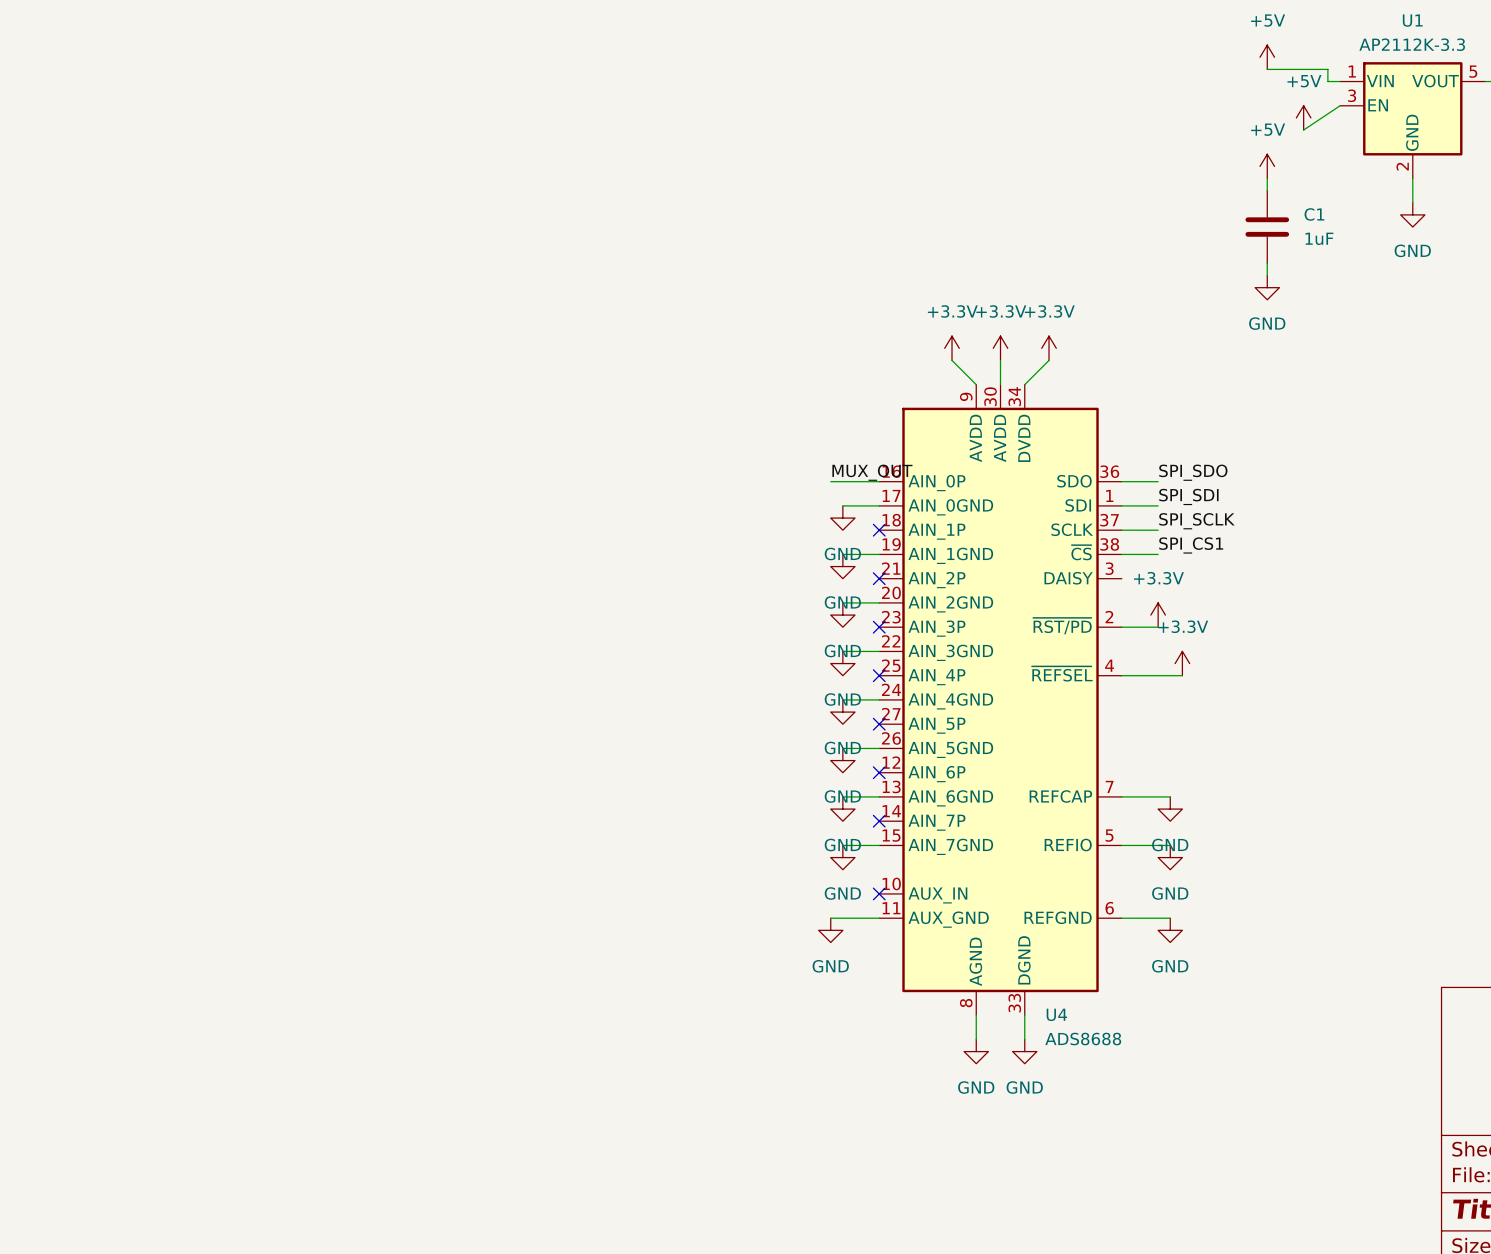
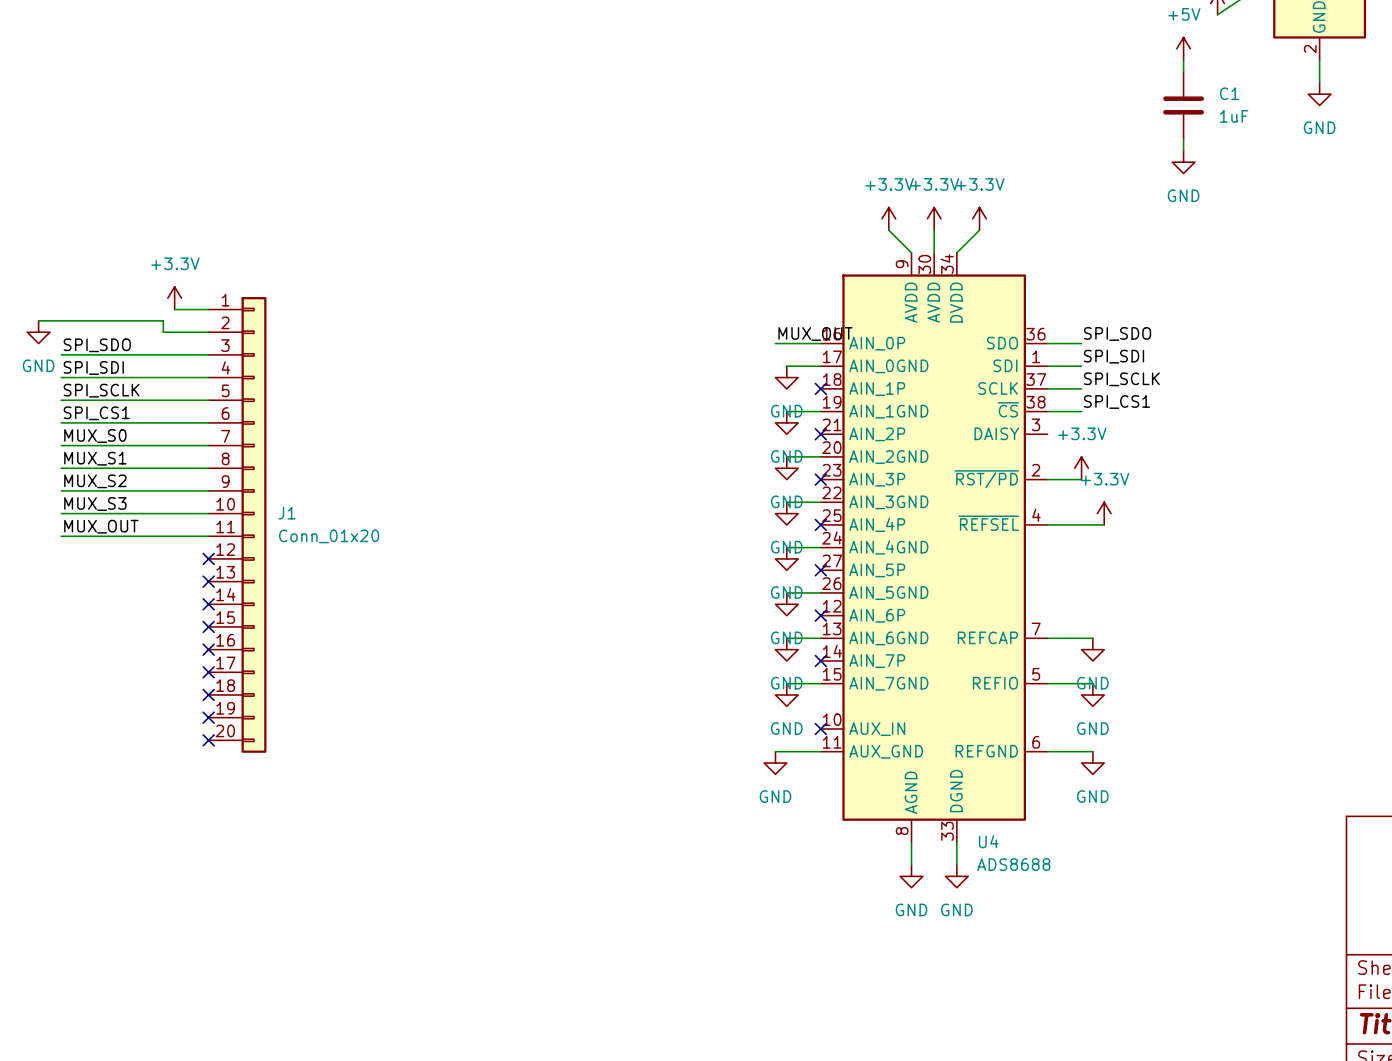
power symbol: none -> +3.3V (174, 298)
wire: none -> (174, 309) (208, 309)
wire: none -> (38, 320) (163, 320) (163, 332) (208, 332)
power symbol: none -> GND (38, 332)
label: none -> SPI_SDO (97, 345)
wire: none -> (61, 354) (208, 354)
label: none -> SPI_SDI (93, 367)
wire: none -> (61, 377) (208, 377)
label: none -> SPI_SCLK (101, 390)
wire: none -> (61, 400) (208, 400)
label: none -> SPI_CS1 (96, 413)
wire: none -> (61, 422) (208, 422)
label: none -> MUX_S0 (95, 436)
wire: none -> (61, 445) (208, 445)
label: none -> MUX_S1 (95, 458)
wire: none -> (61, 468) (208, 468)
label: none -> MUX_S2 (95, 481)
wire: none -> (61, 490) (208, 490)
label: none -> MUX_S3 (95, 504)
wire: none -> (61, 513) (208, 513)
J1: none -> Conn_01x20 (237, 524)
label: none -> MUX_OUT (101, 526)
wire: none -> (61, 536) (208, 536)
no-connect mark: none -> (208, 558)
no-connect mark: none -> (208, 581)
no-connect mark: none -> (208, 604)
no-connect mark: none -> (208, 626)
no-connect mark: none -> (208, 649)
no-connect mark: none -> (208, 672)
no-connect mark: none -> (208, 694)
no-connect mark: none -> (208, 717)
no-connect mark: none -> (208, 740)

